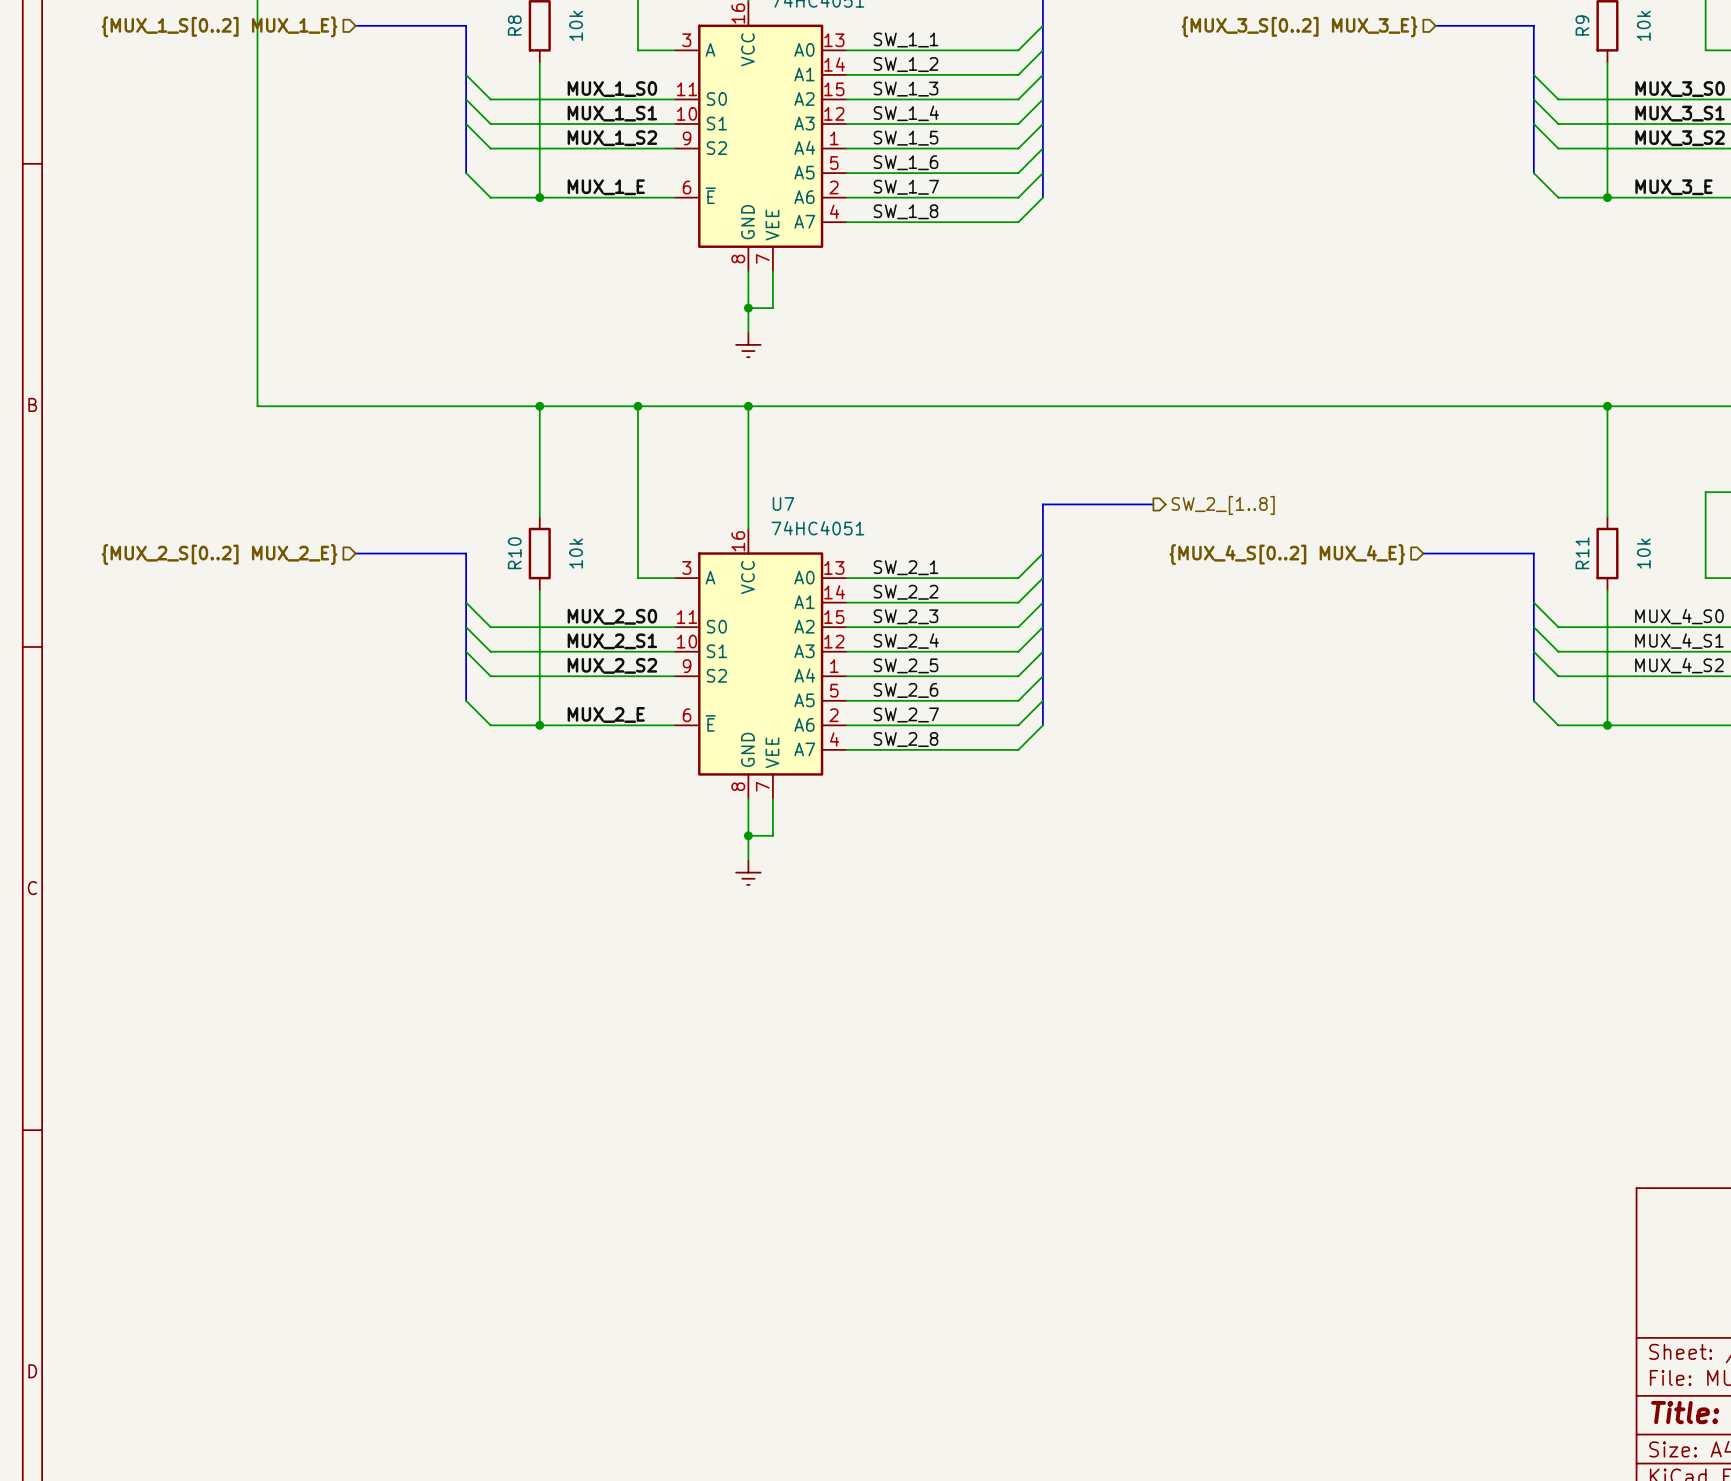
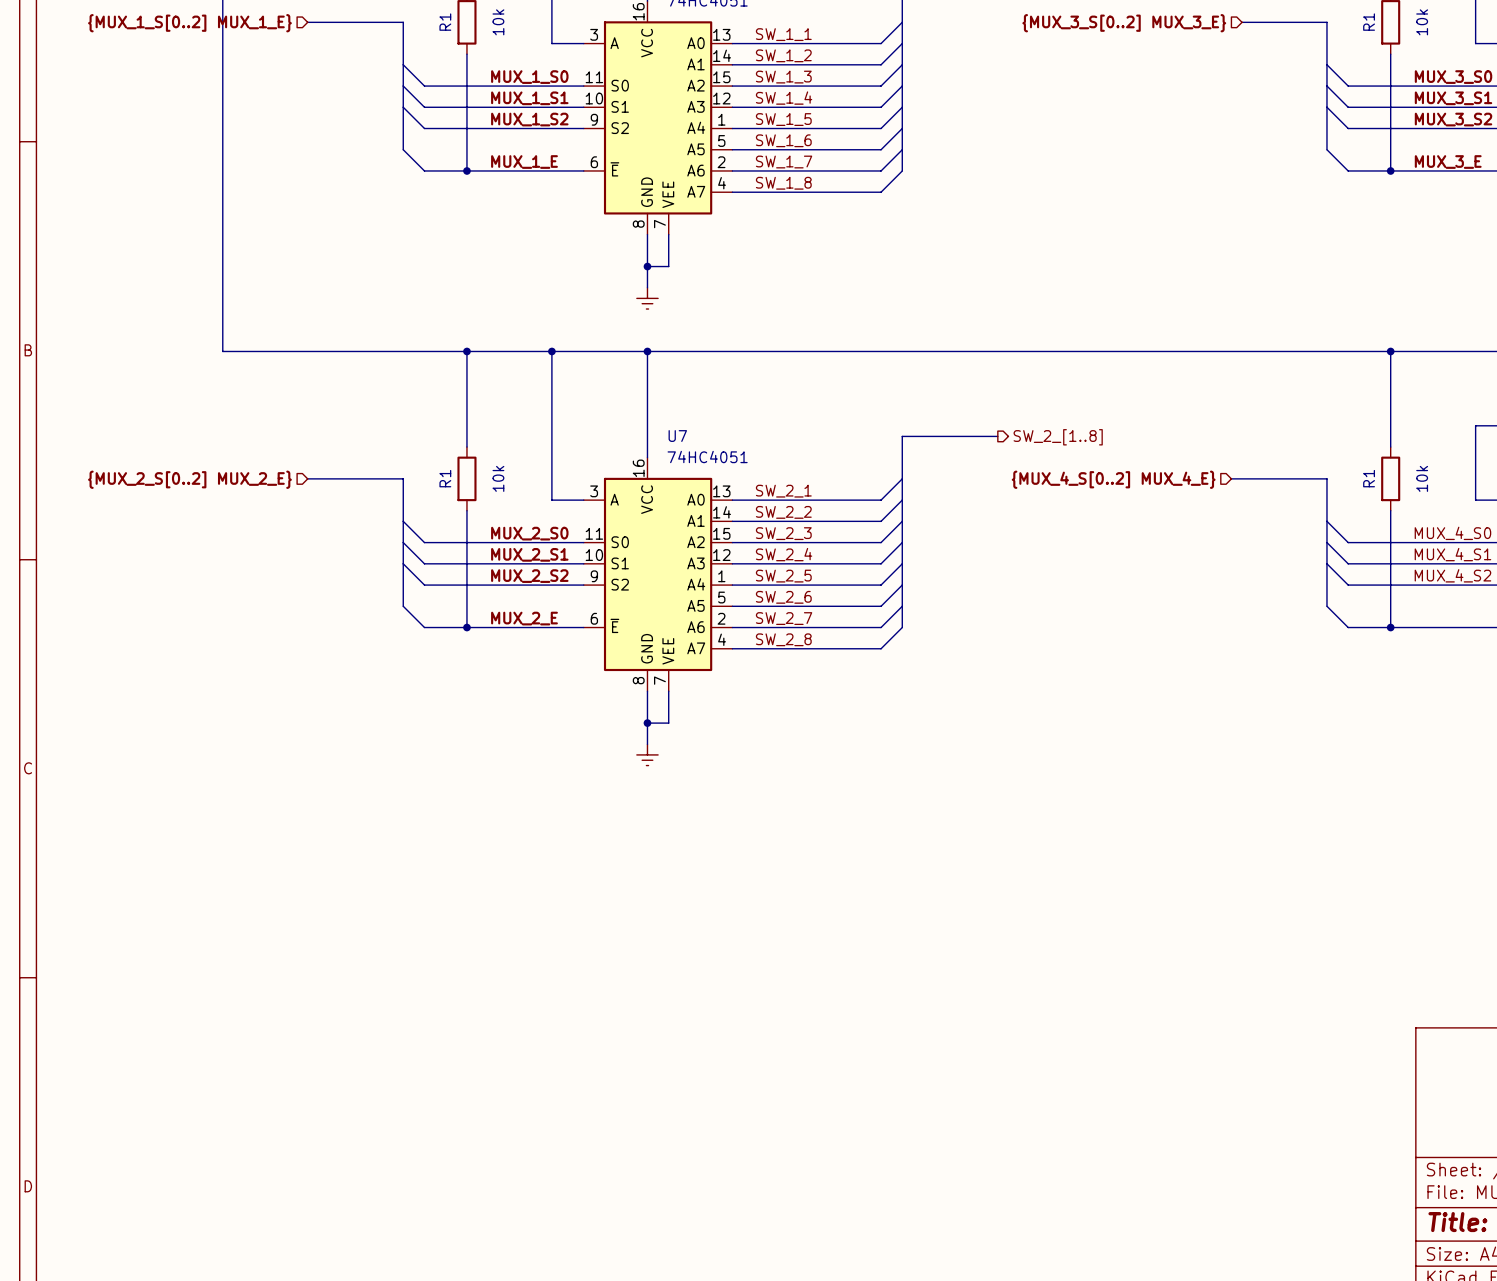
R8 name: R8 (514, 25) -> R1 (445, 22)
R9 name: R9 (1582, 25) -> R1 (1369, 22)
R10 name: R10 (514, 553) -> R1 (445, 478)
R11 name: R11 (1582, 553) -> R1 (1369, 478)

